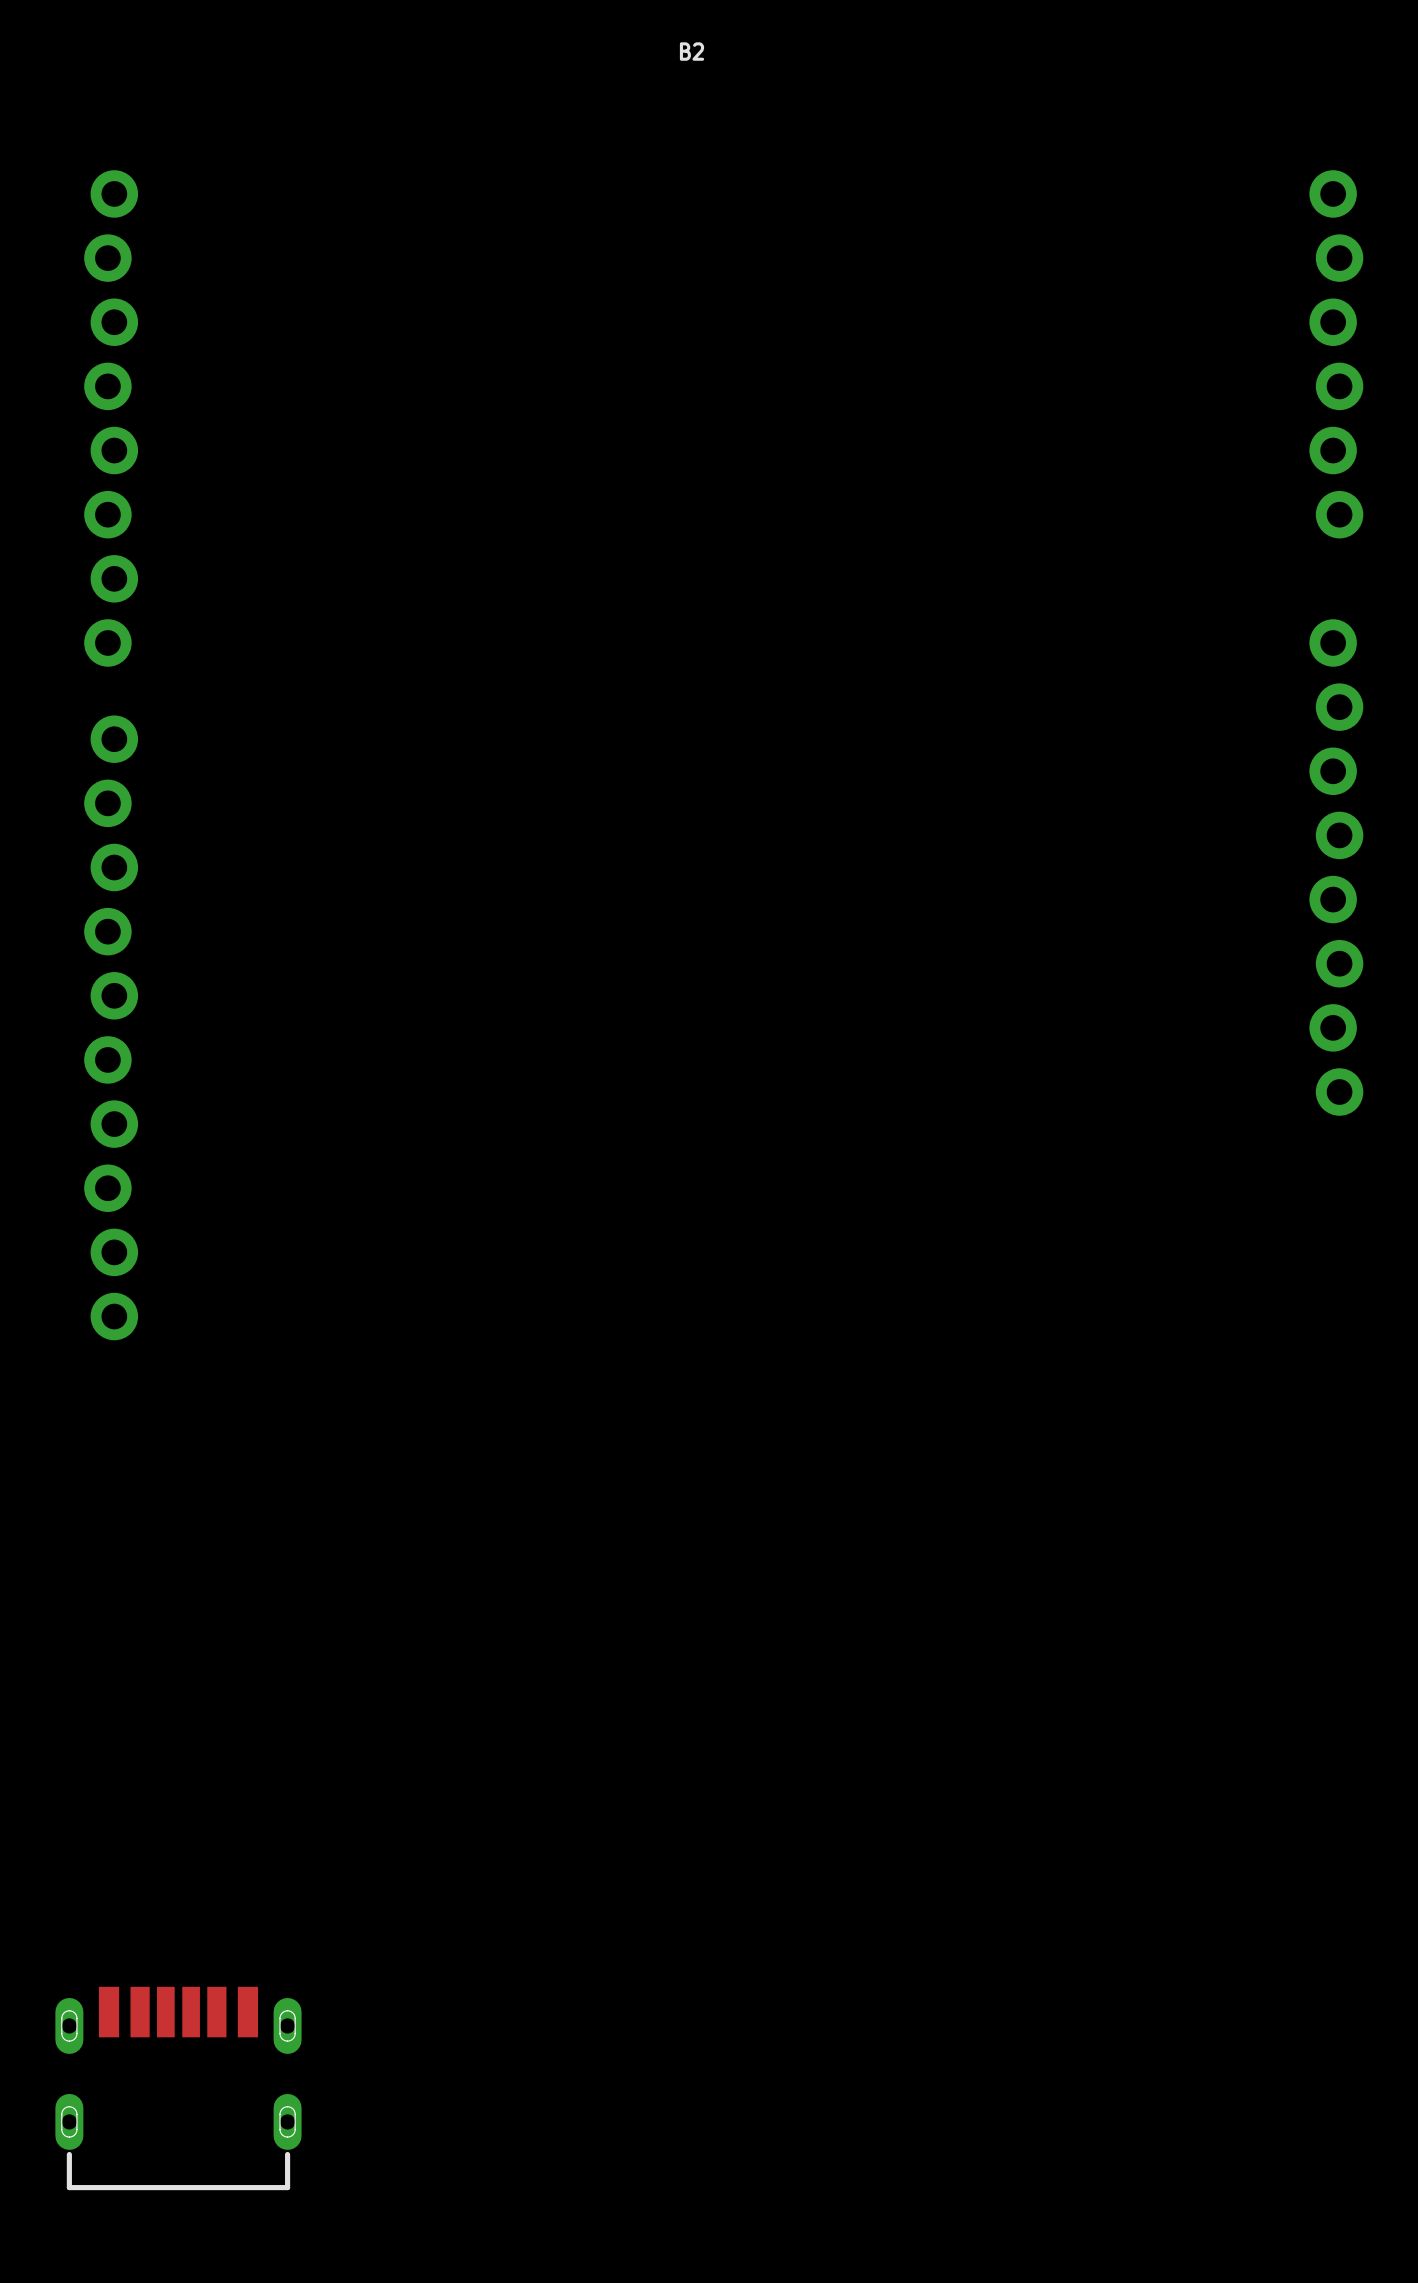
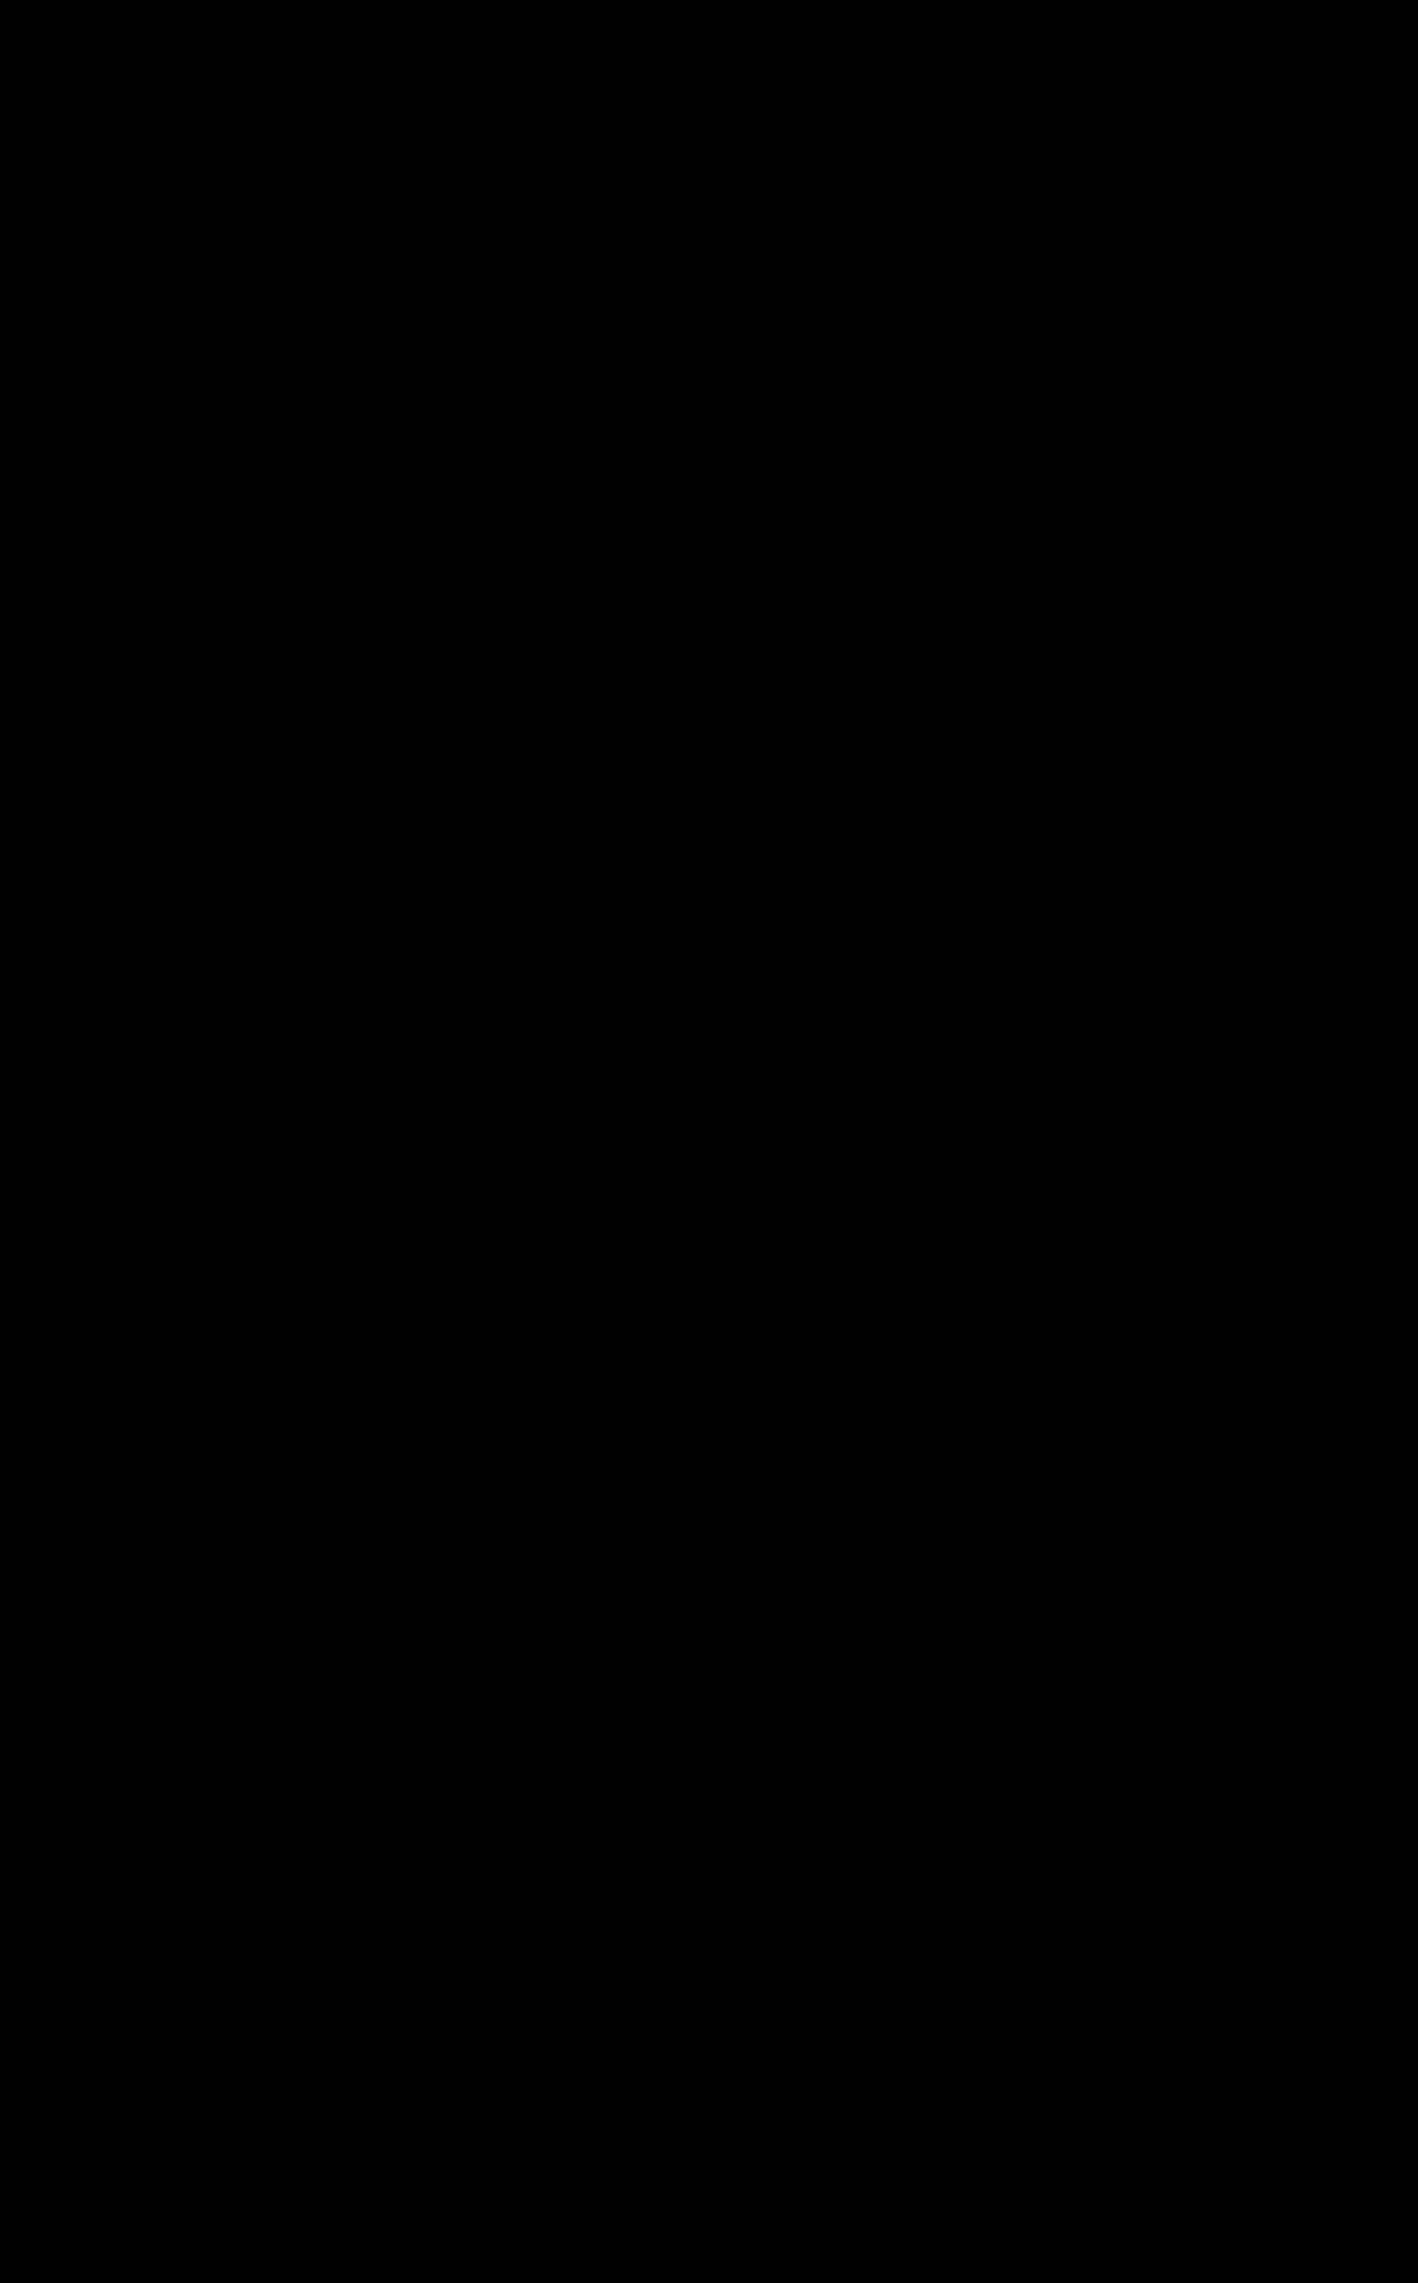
B2: (723, 755) -> none
part: (178, 2088) -> none

